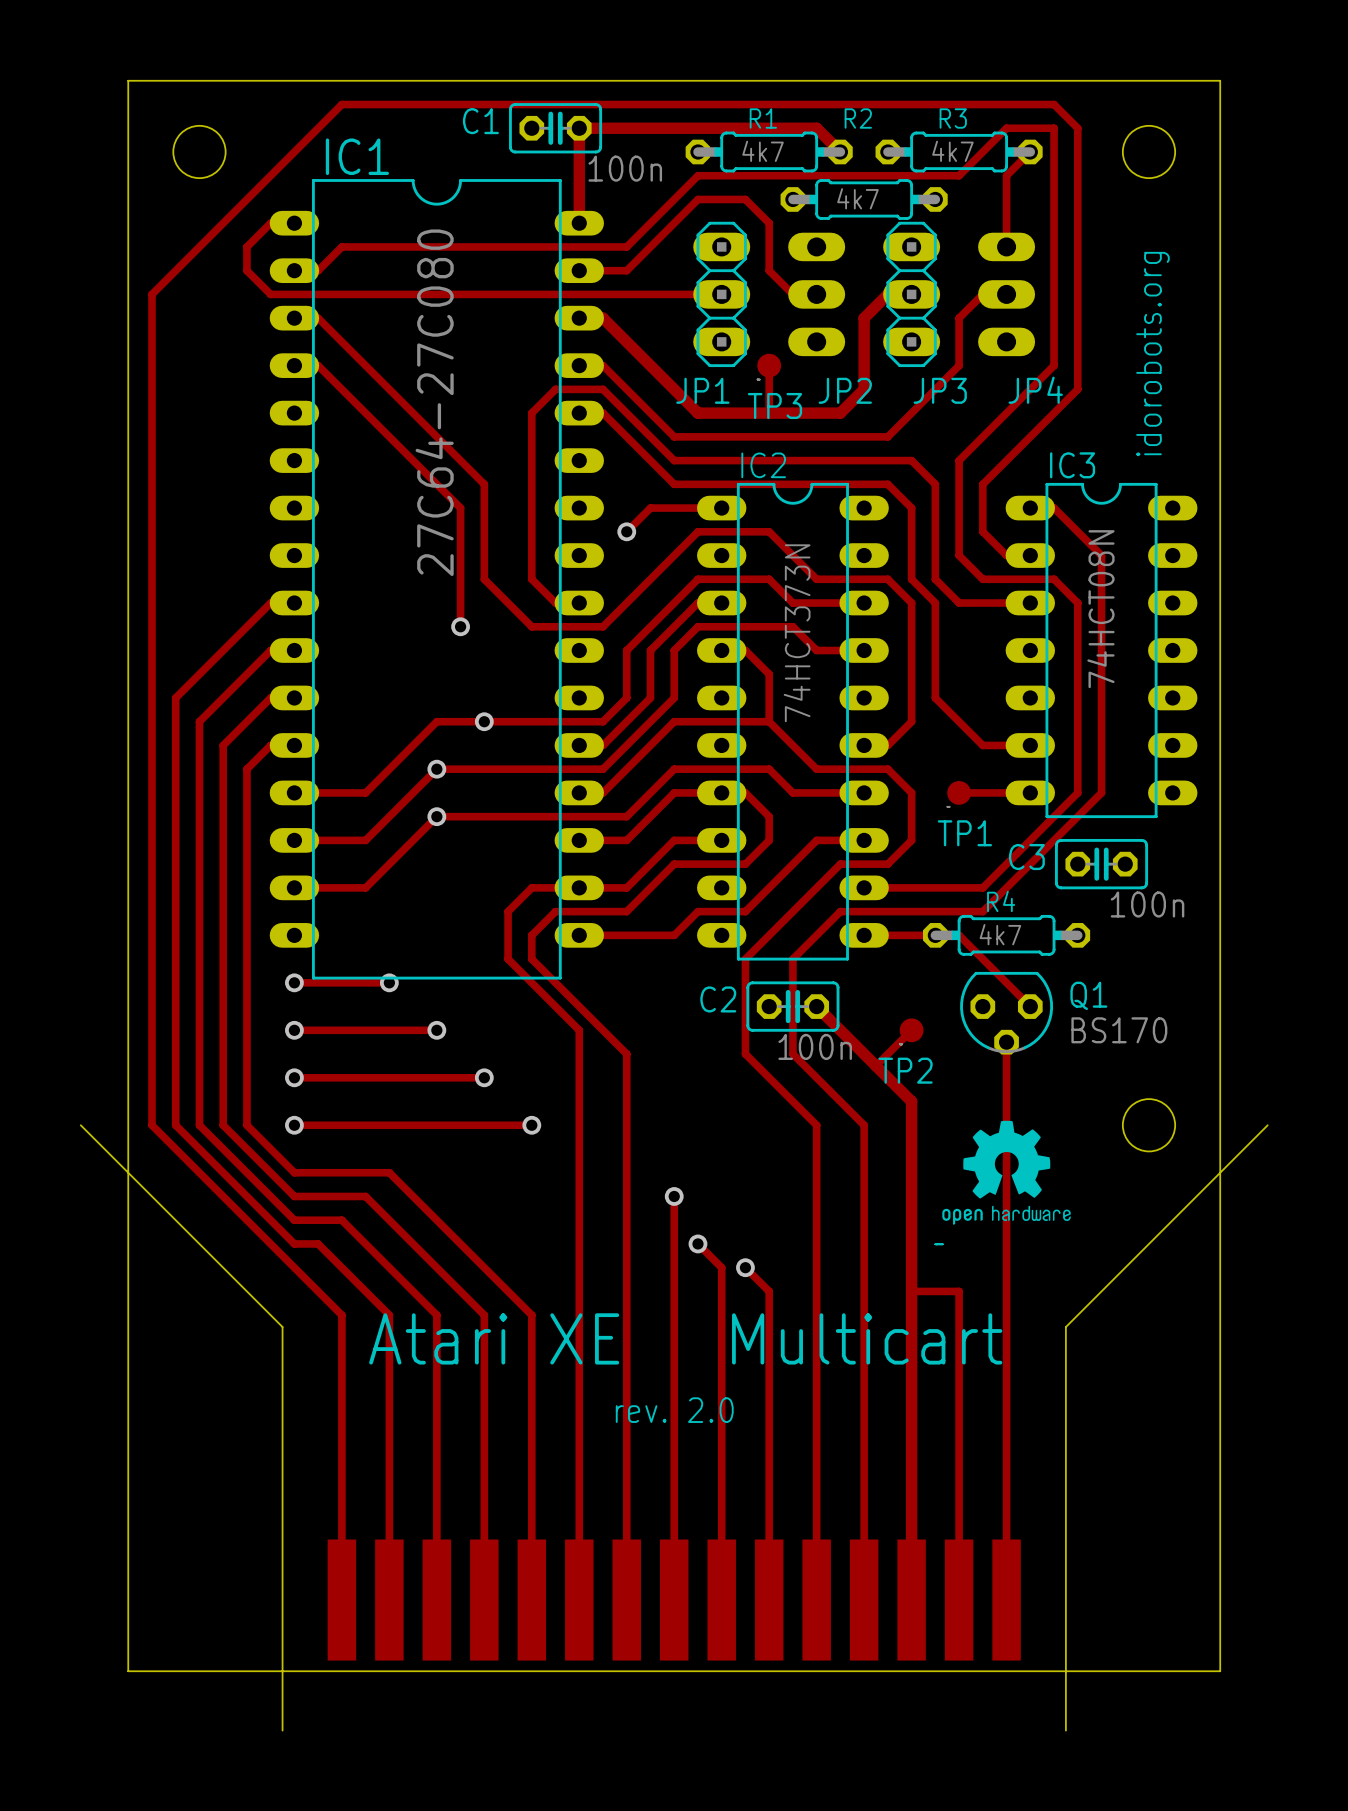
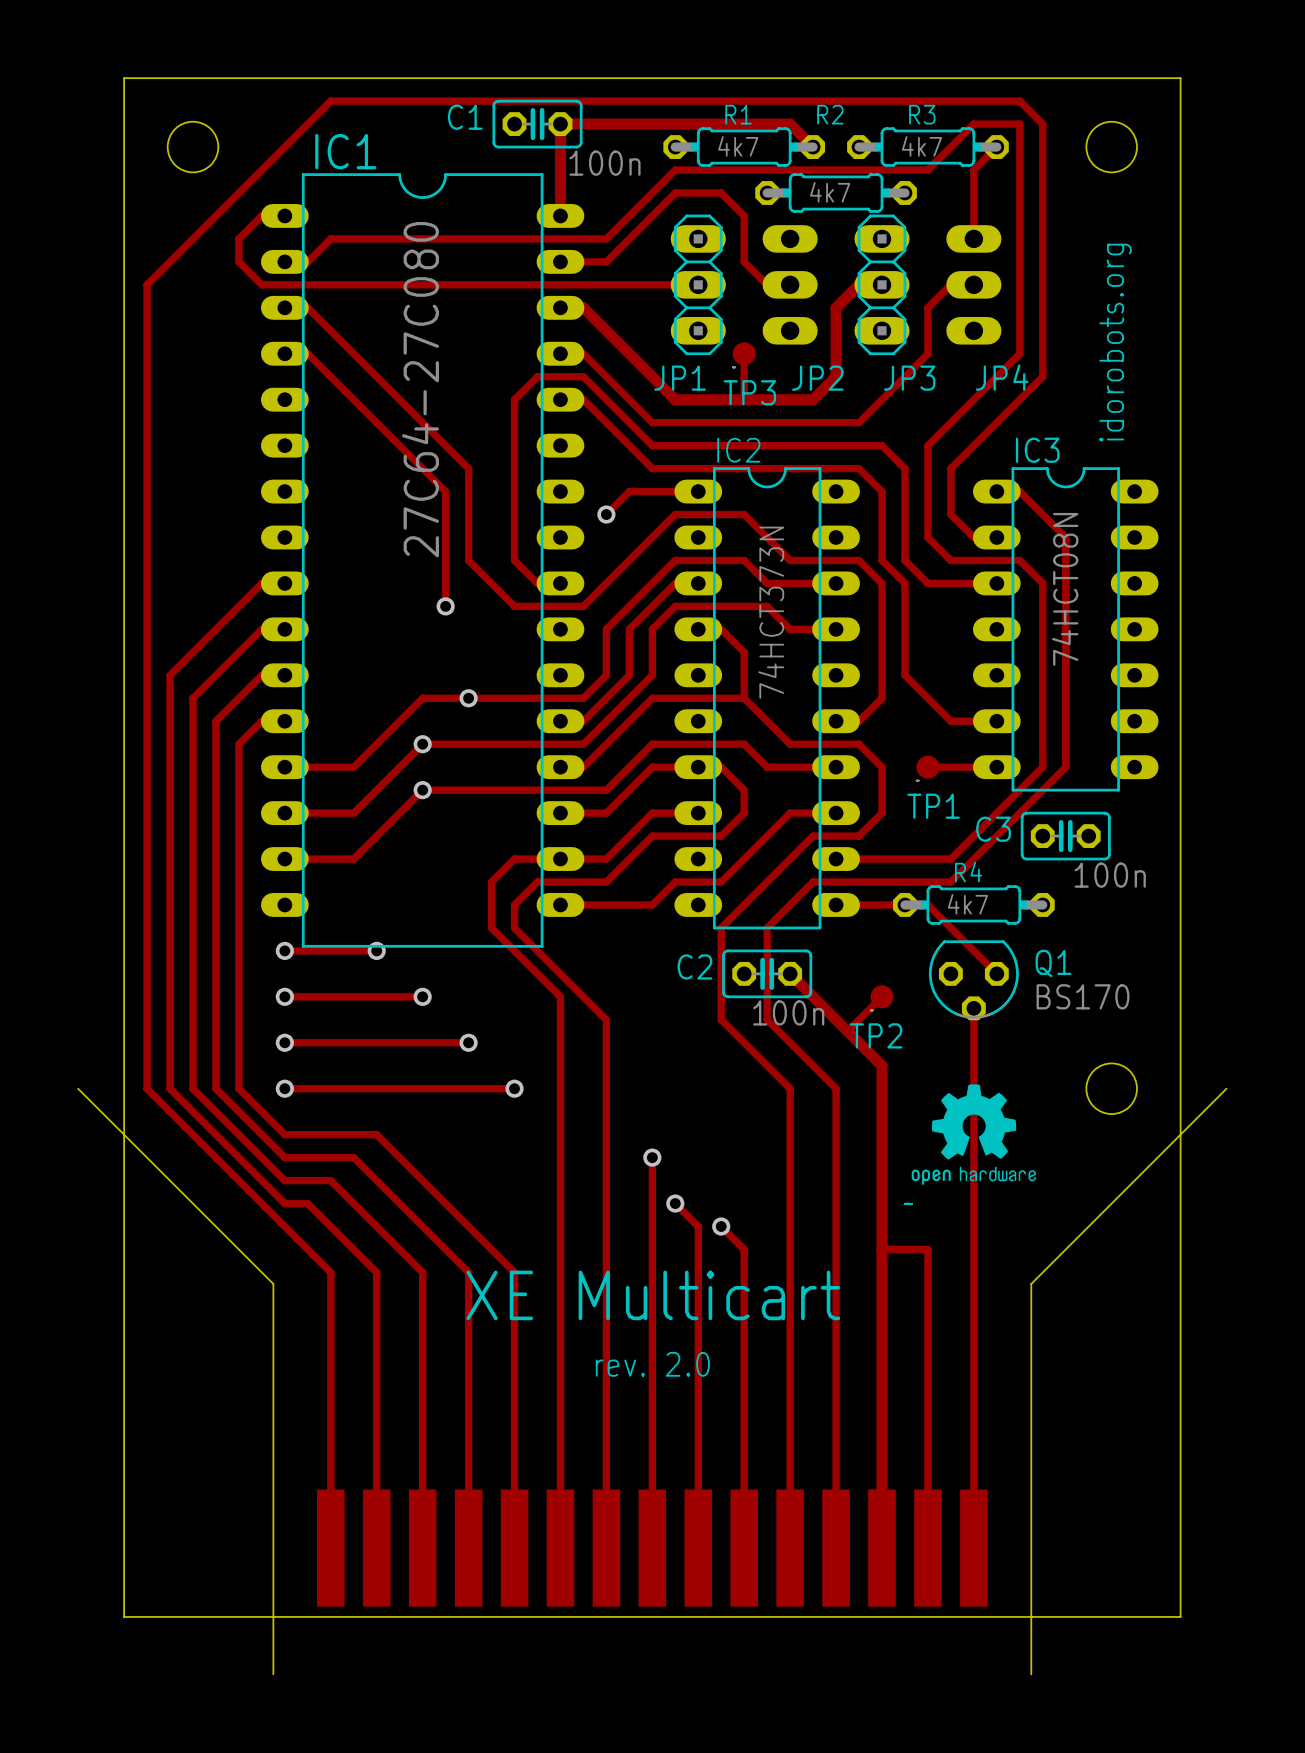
text: Atari XE (494, 1338) -> none
text: Multicart (867, 1338) -> XE Multicart (653, 1295)

